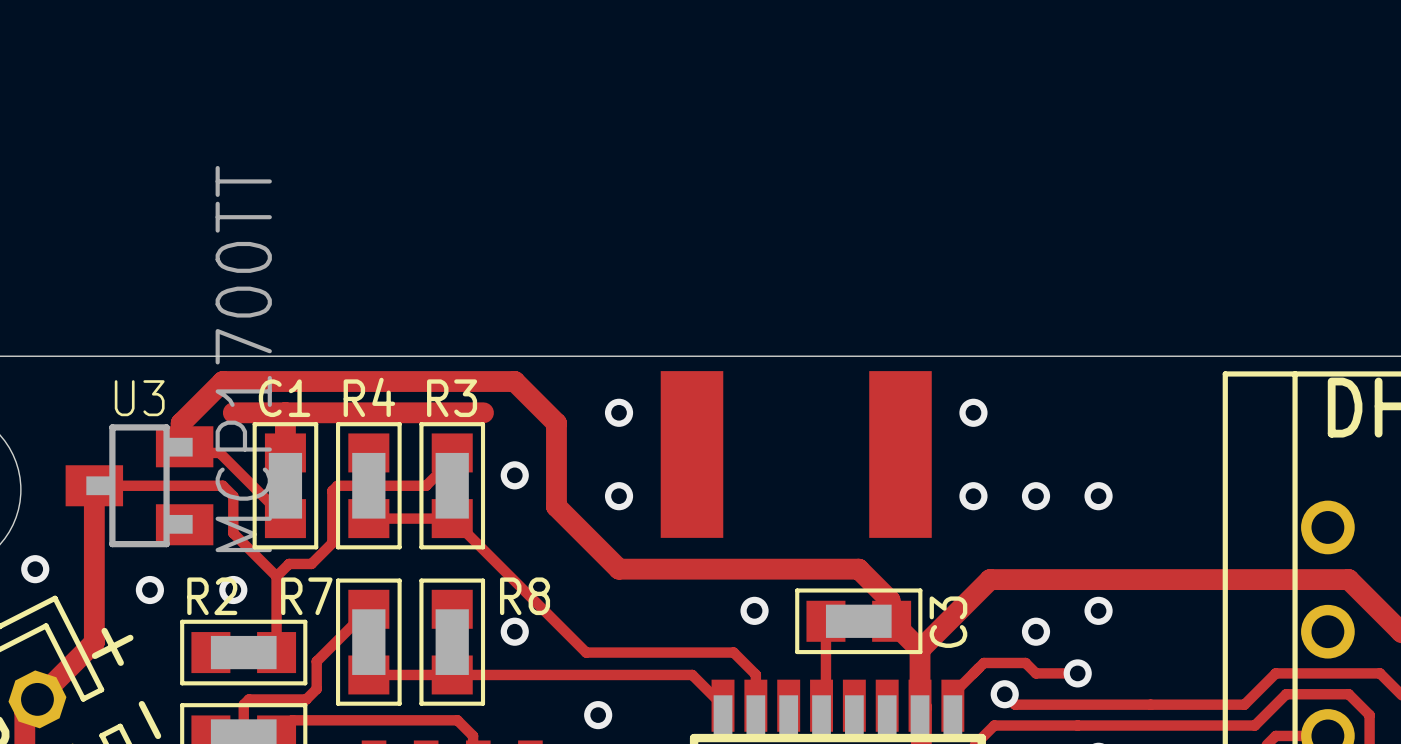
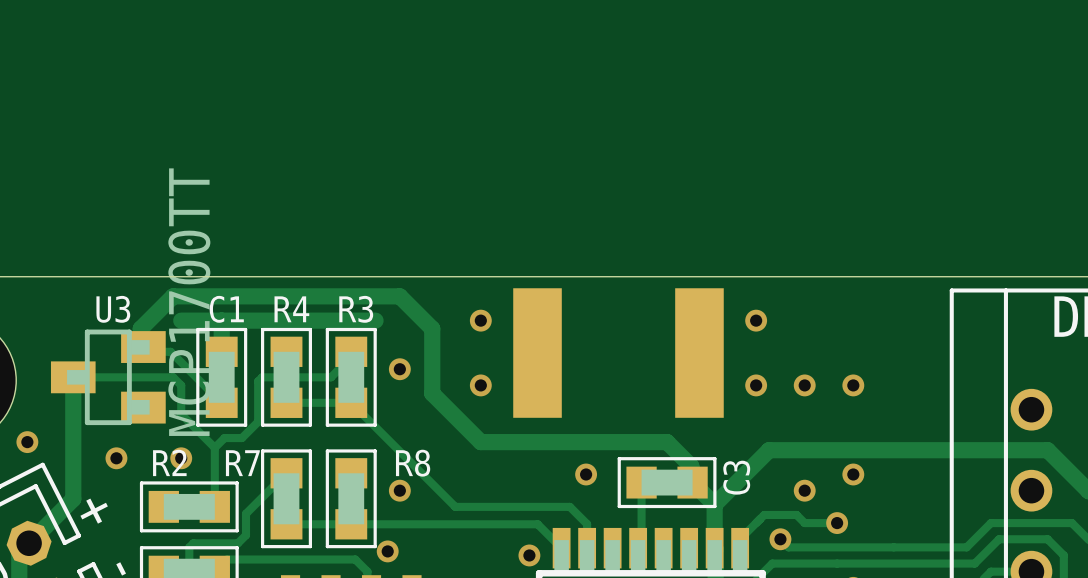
via: none -> (387, 551)
via: (598, 715) -> none
via: none -> (529, 555)

